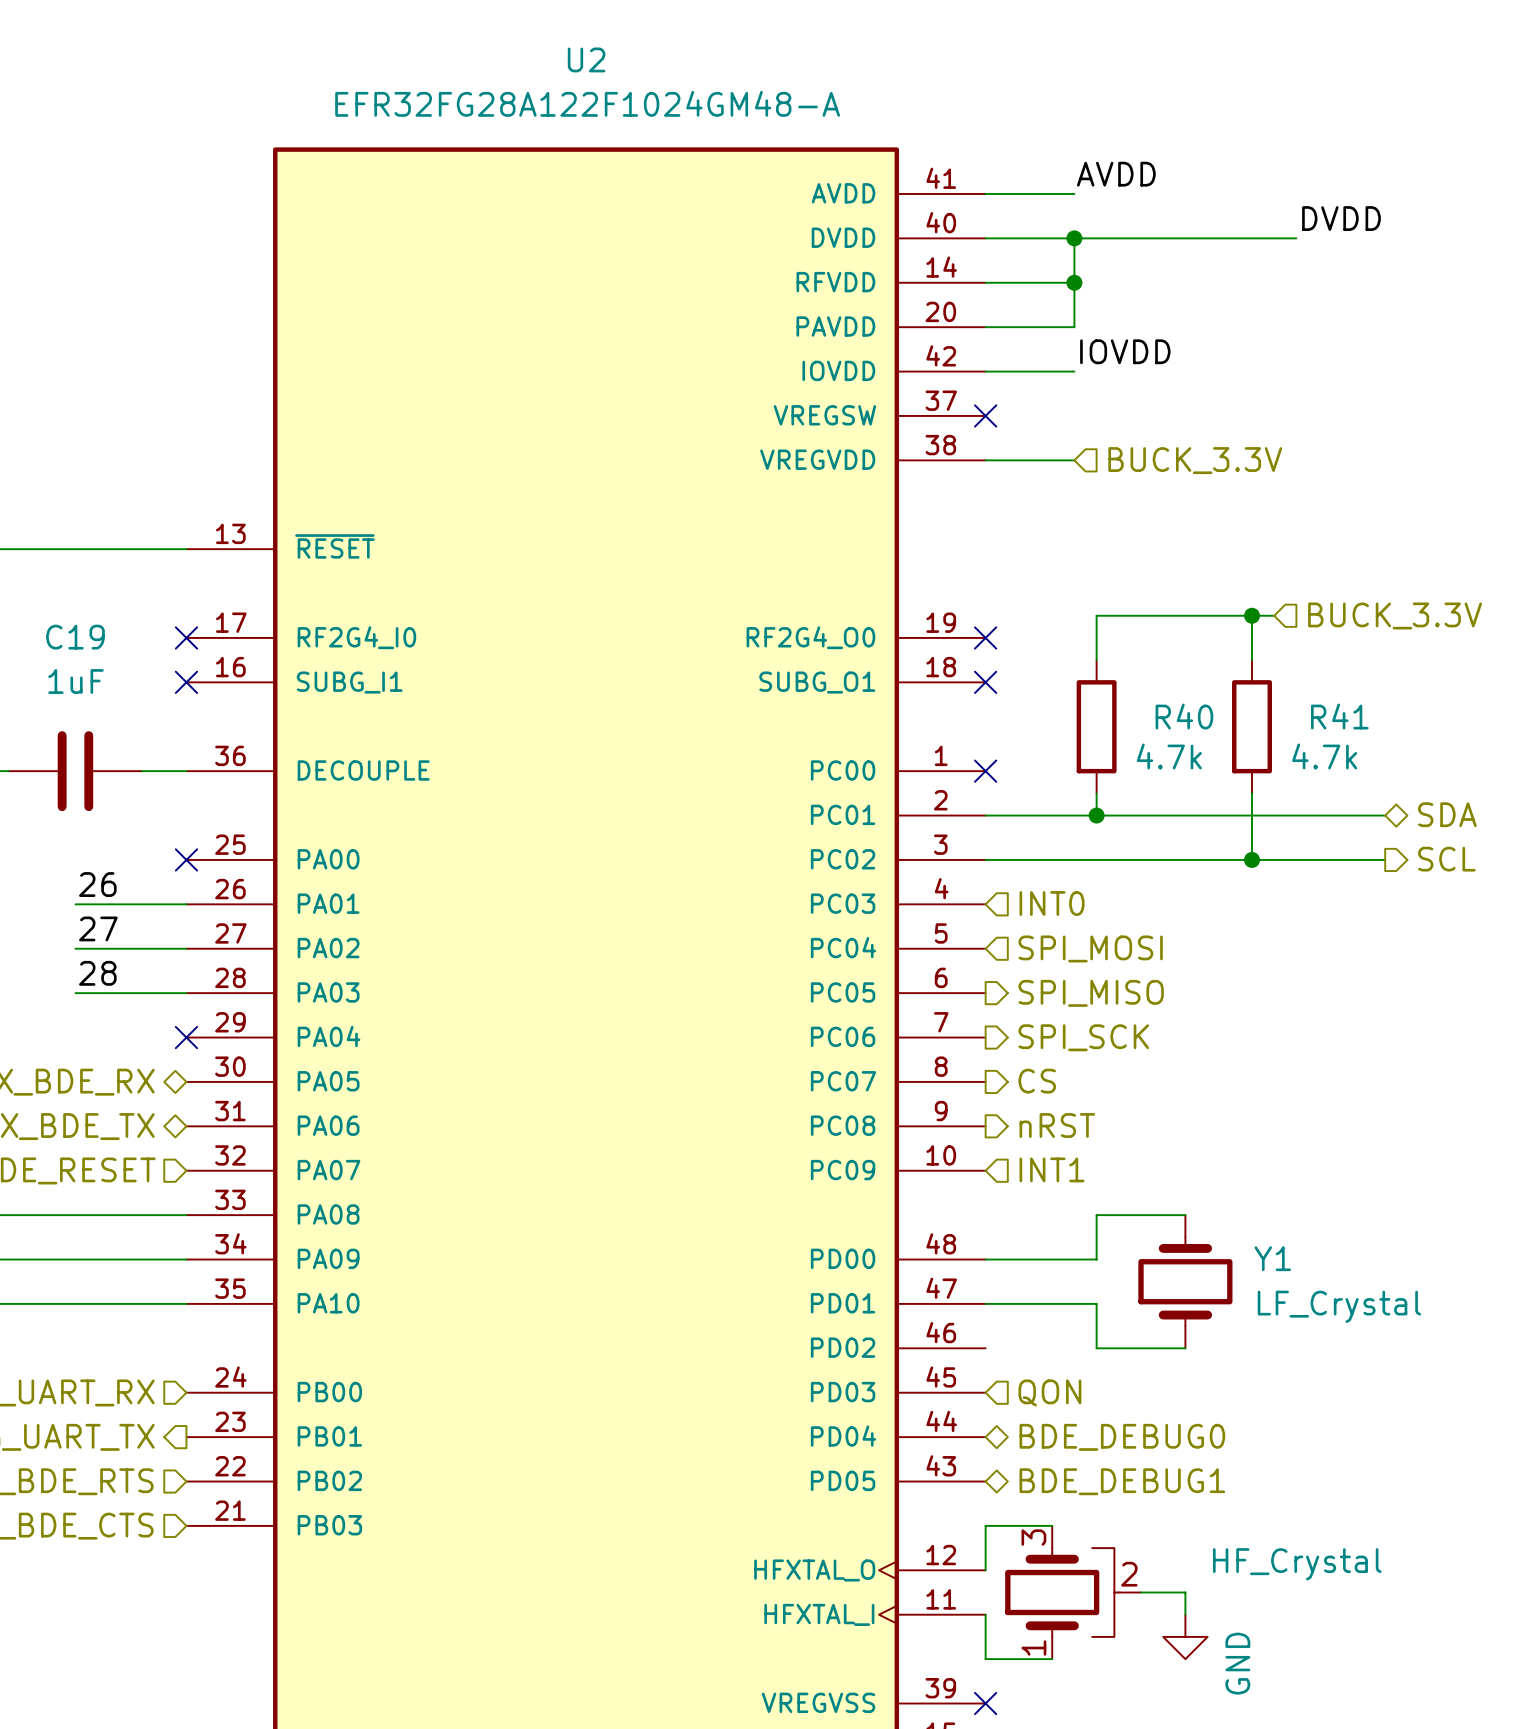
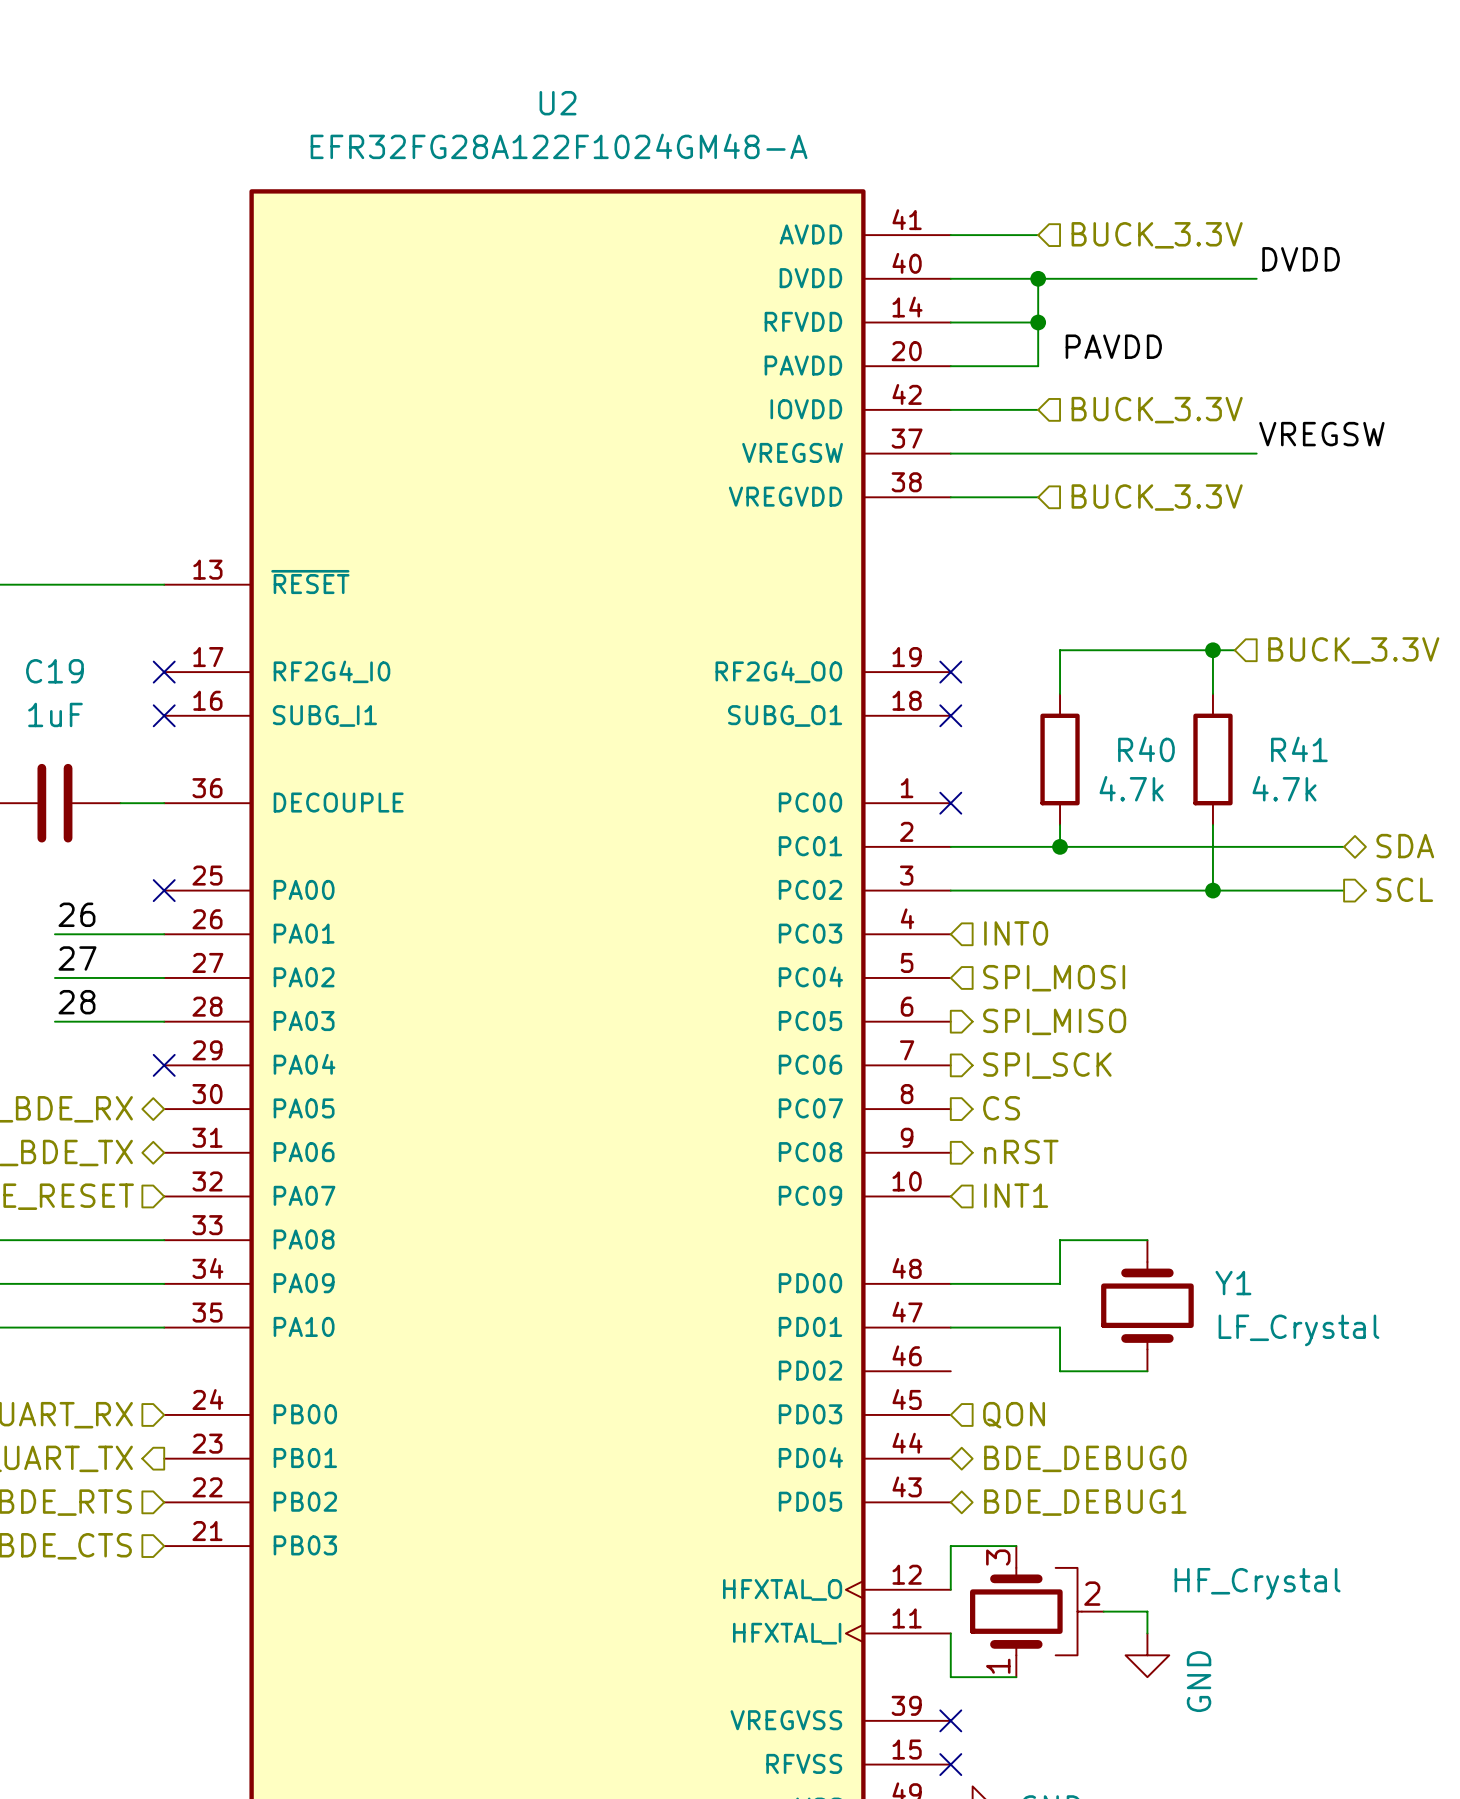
label: AVDD (1116, 174) -> none
hierarchical label: none -> BUCK_3.3V (1157, 235)
label: none -> PAVDD (1113, 346)
label: IOVDD (1125, 351) -> none
hierarchical label: none -> BUCK_3.3V (1157, 410)
label: none -> VREGSW (1321, 434)
wire: none -> (950, 453) (1256, 453)
no-connect mark: (985, 415) -> none

